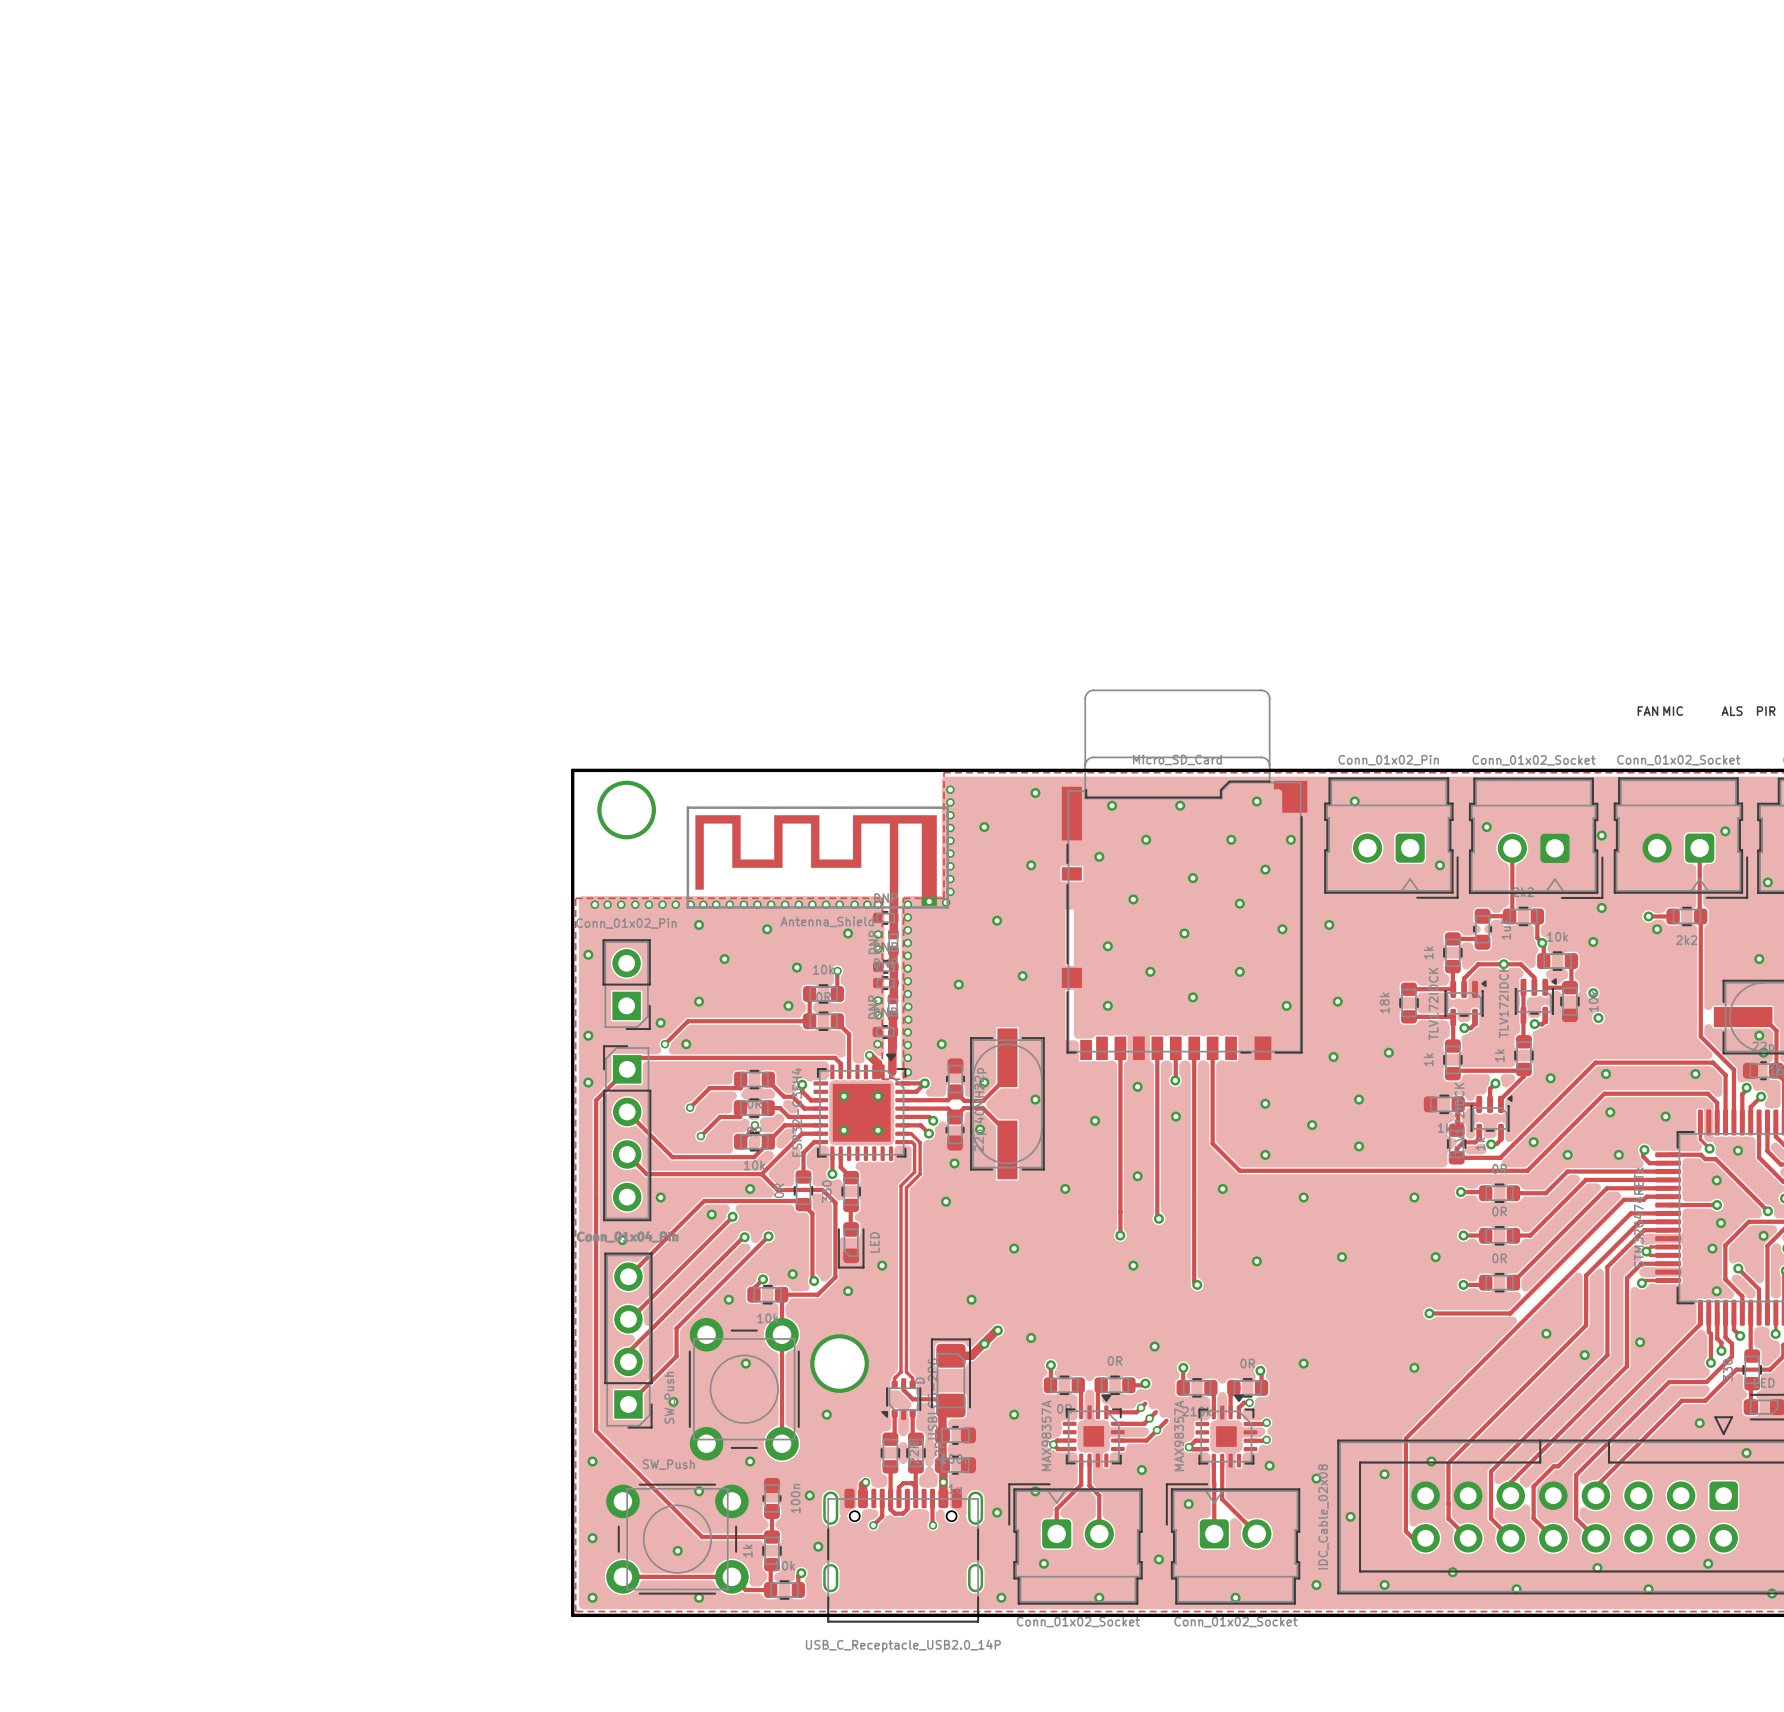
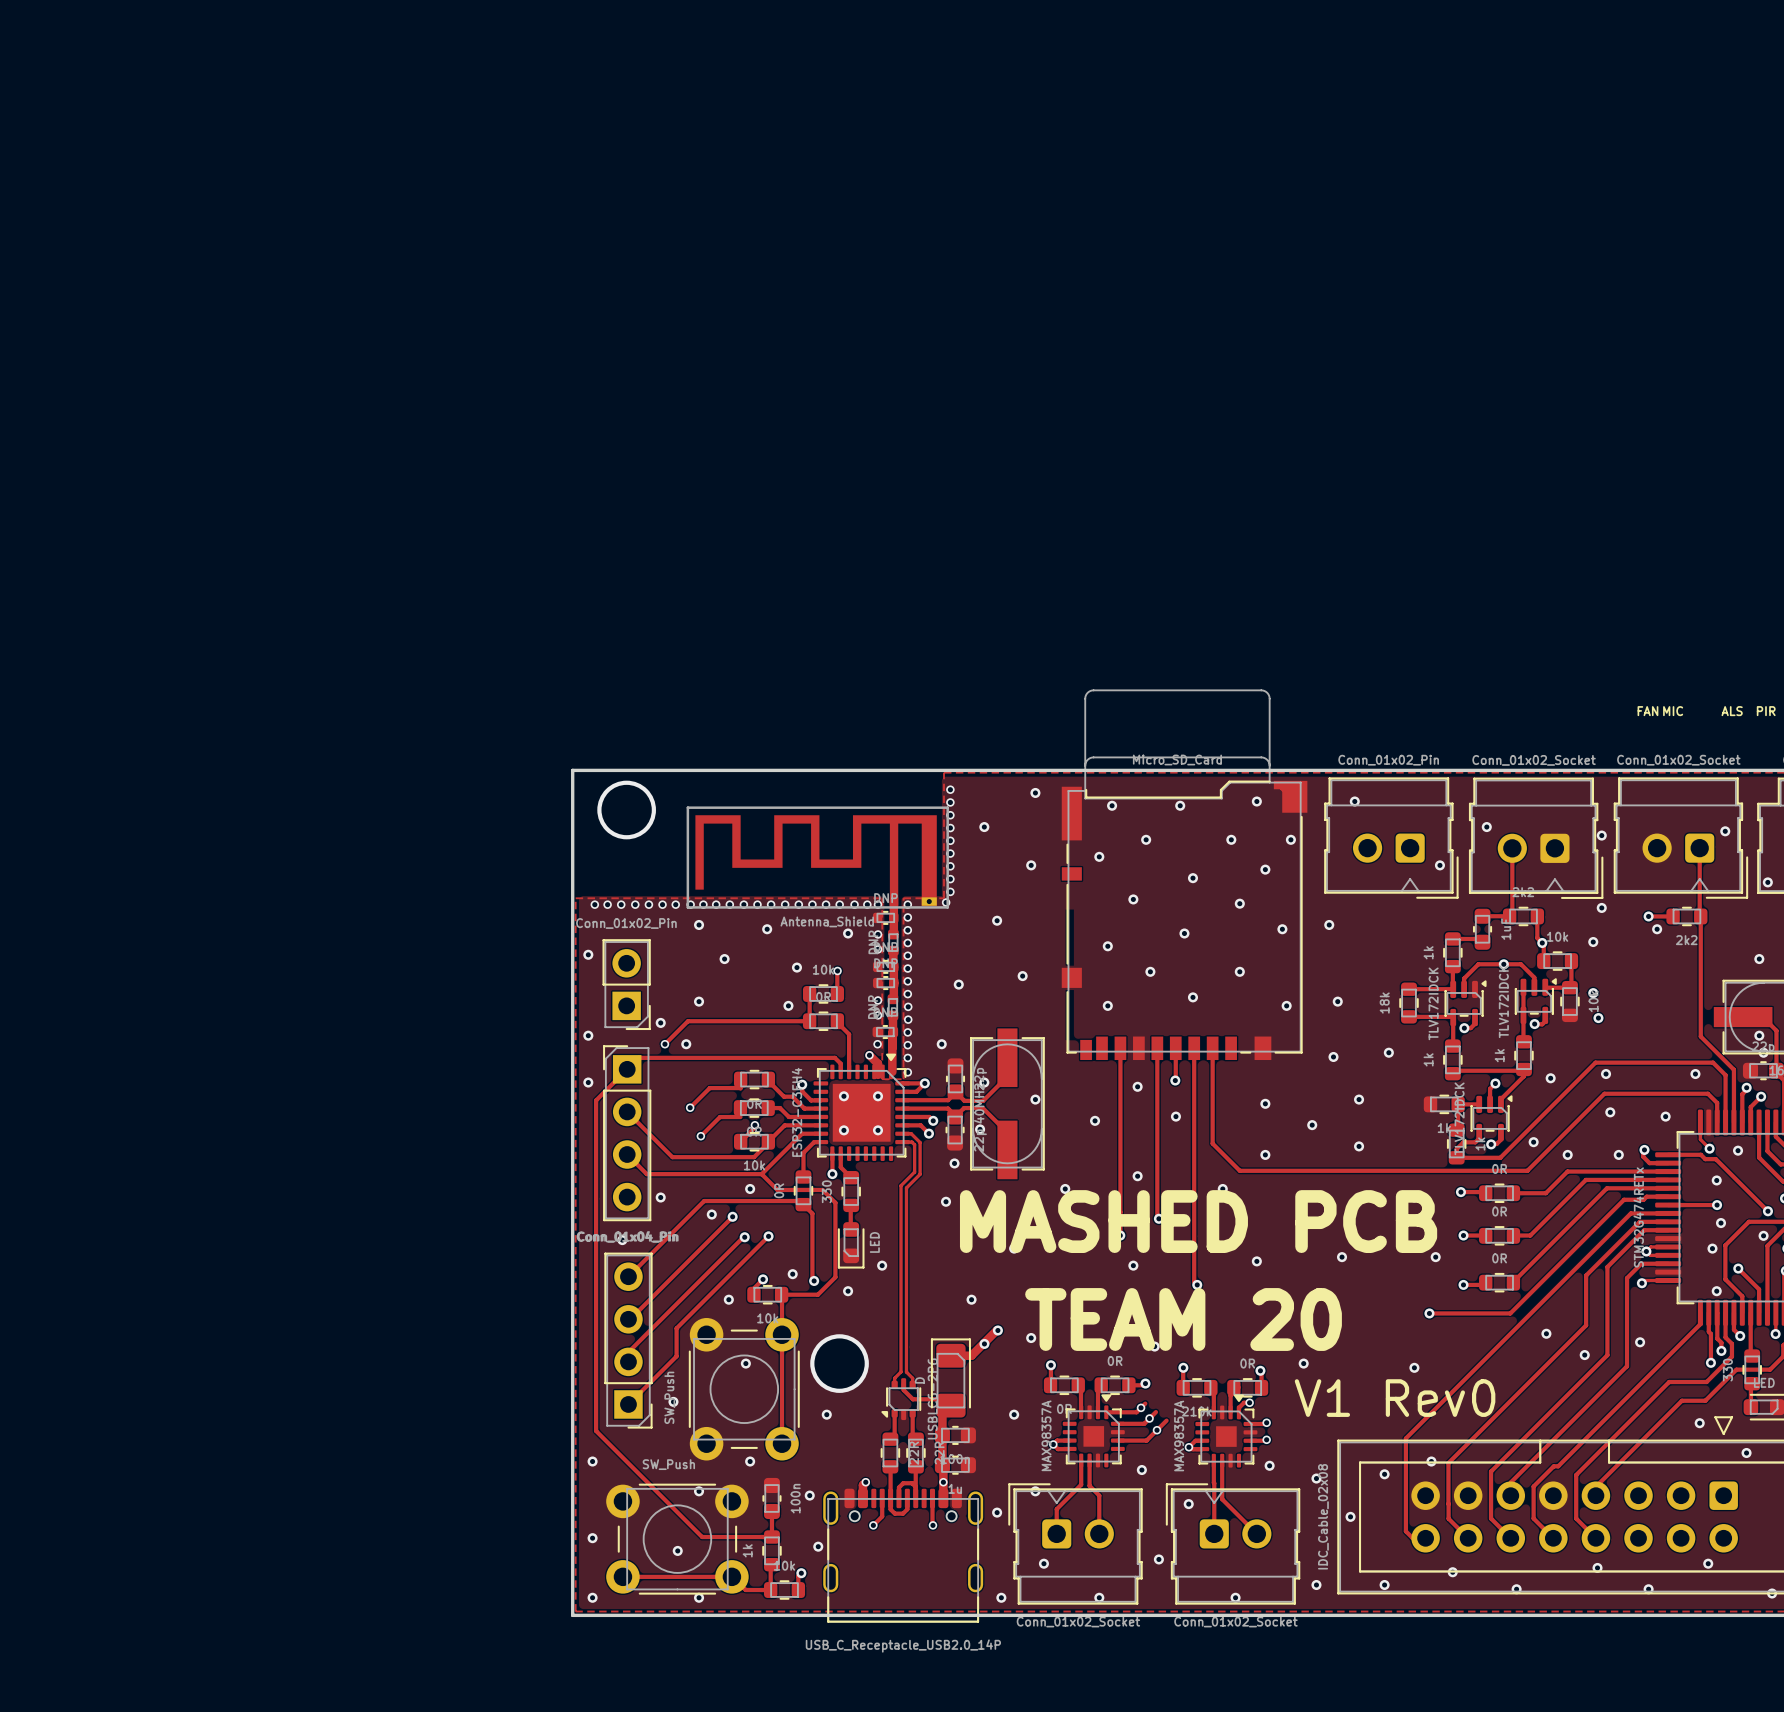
text: none -> MASHED PCB (1198, 1221)
text: none -> TEAM 20 (1183, 1319)
text: none -> V1 Rev0 (1395, 1398)

